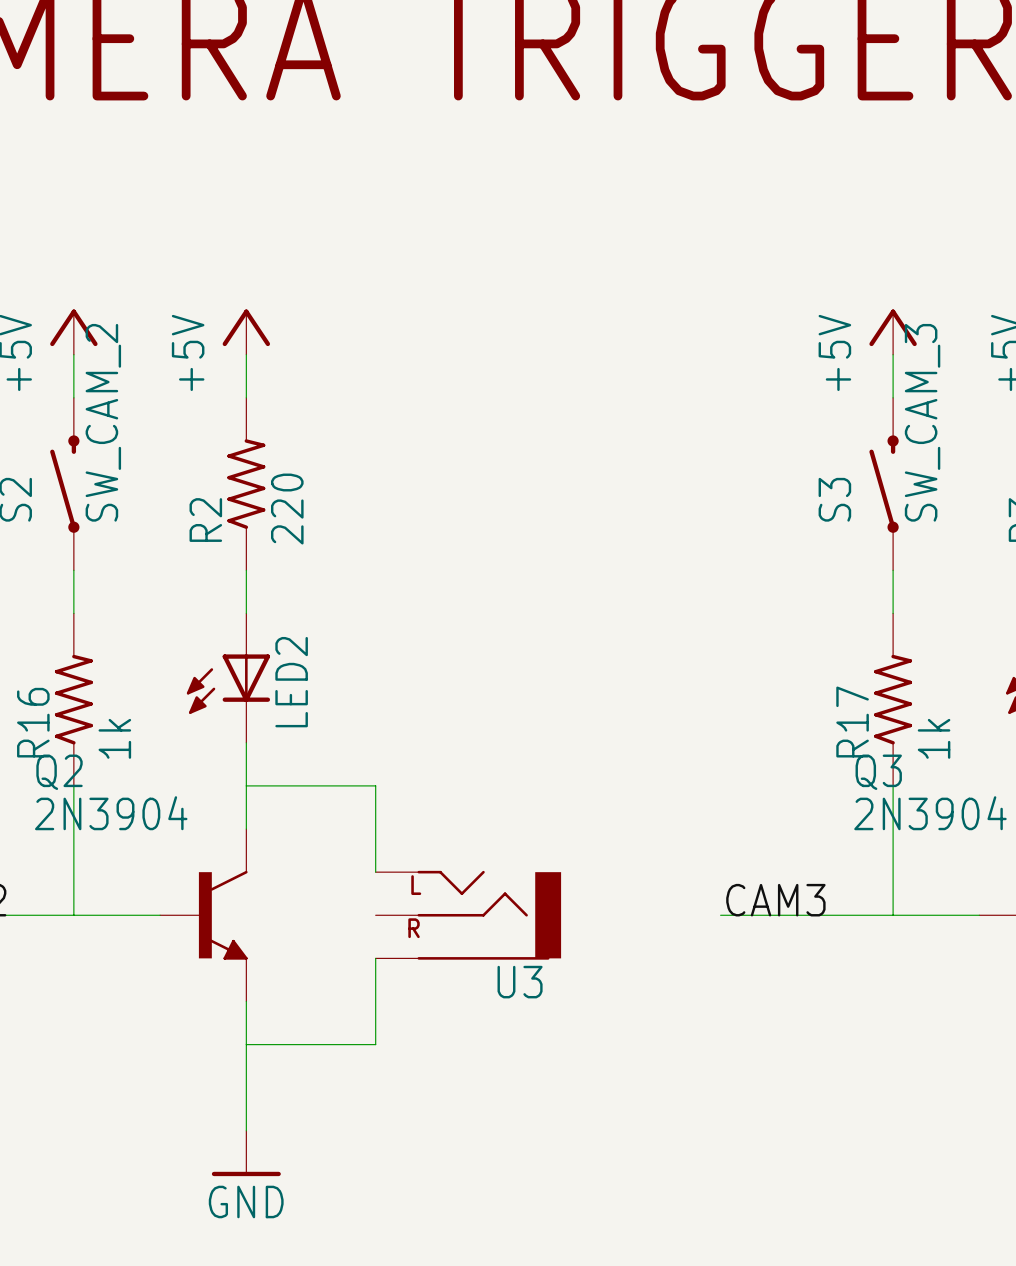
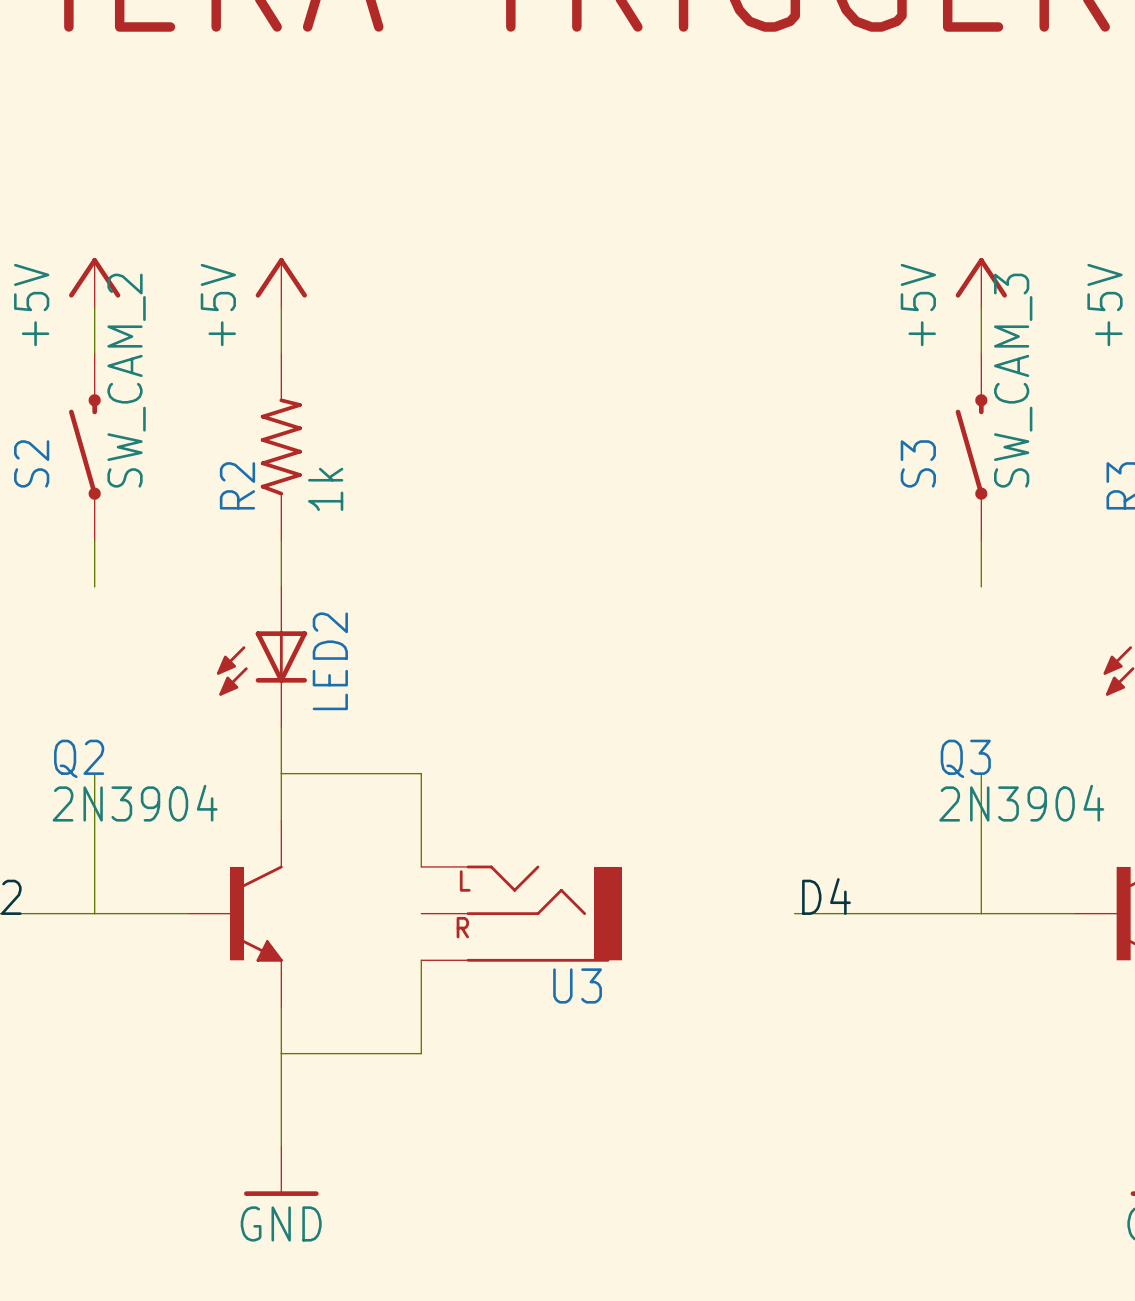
R2 value: 220 (287, 509) -> 1k (325, 489)
R16: 1k (73, 699) -> none
R17: 1k (893, 699) -> none
label: CAM3 (775, 900) -> D4 (826, 896)

